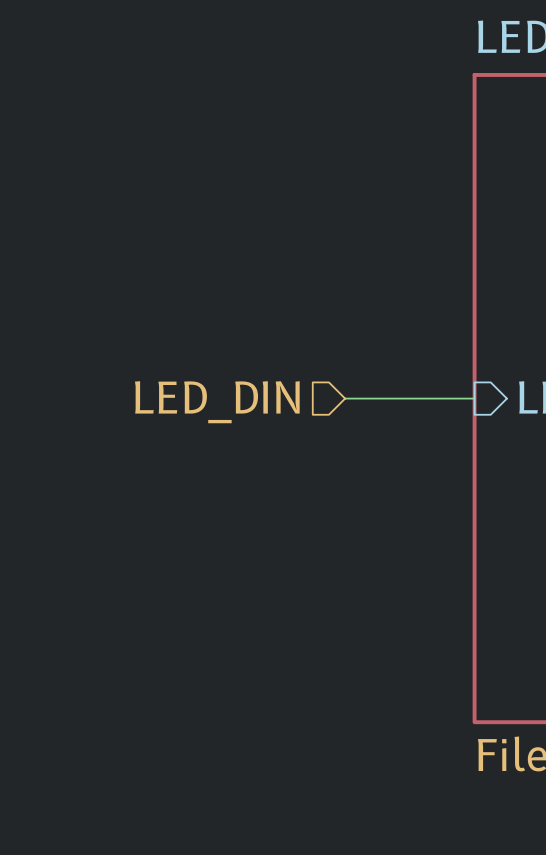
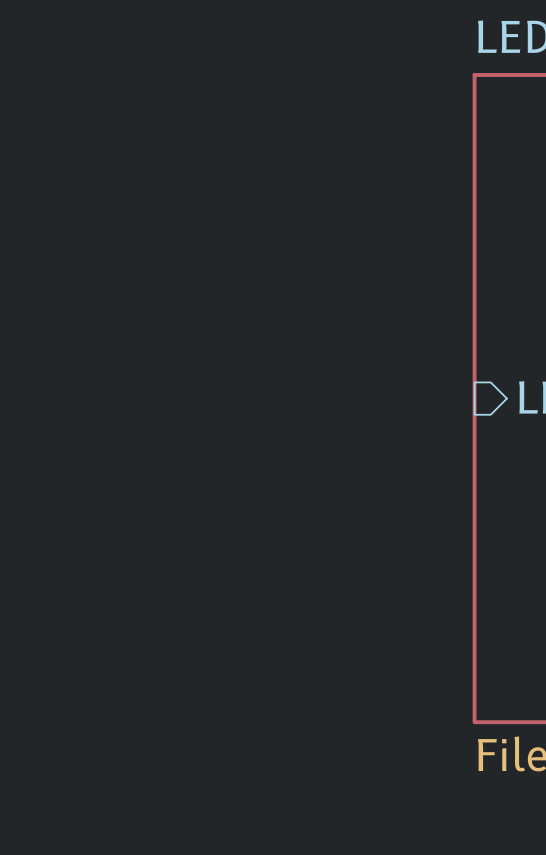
wire: (345, 398) (474, 398) -> none
hierarchical label: LED_DIN (217, 402) -> none

